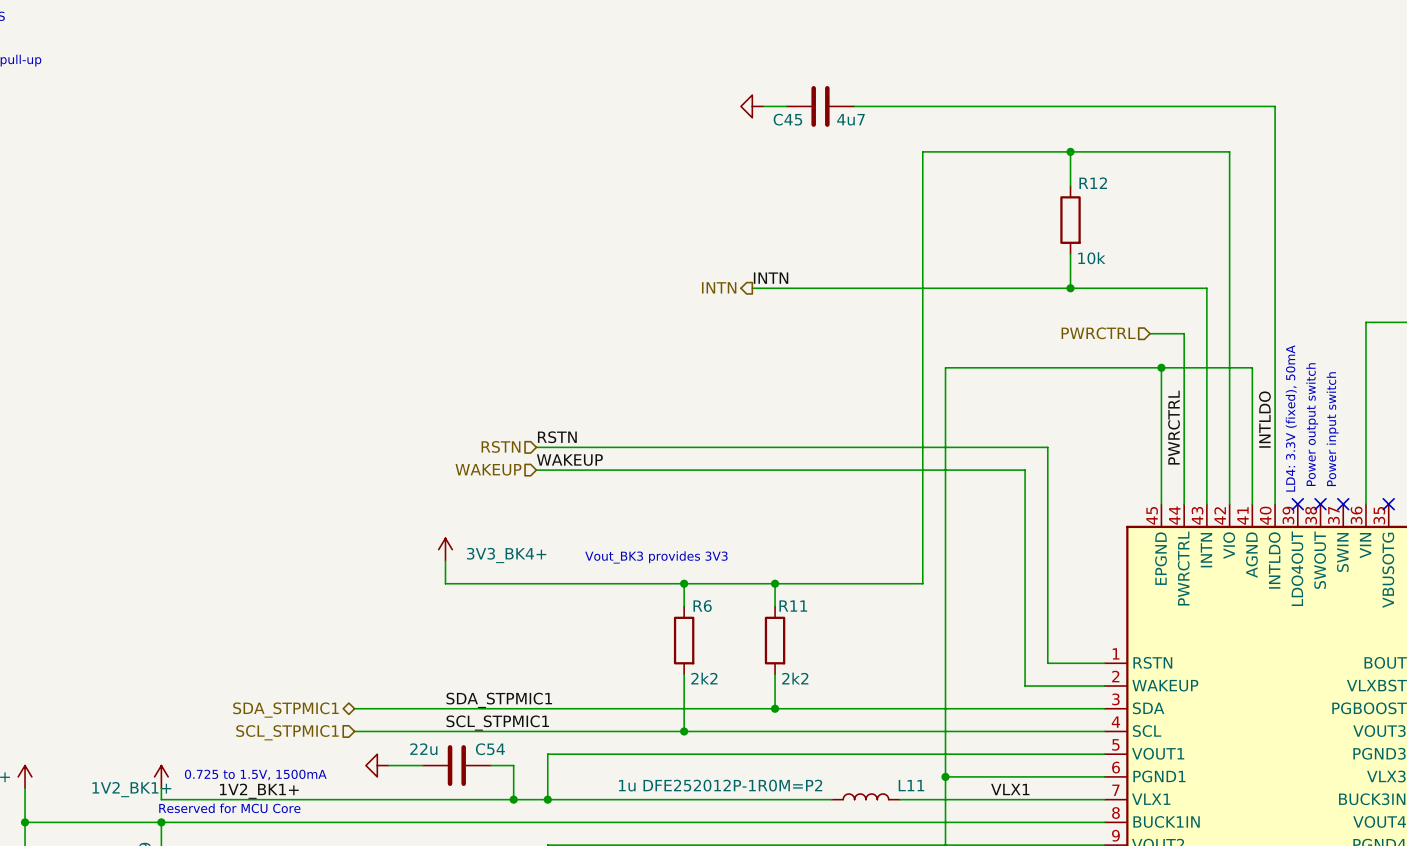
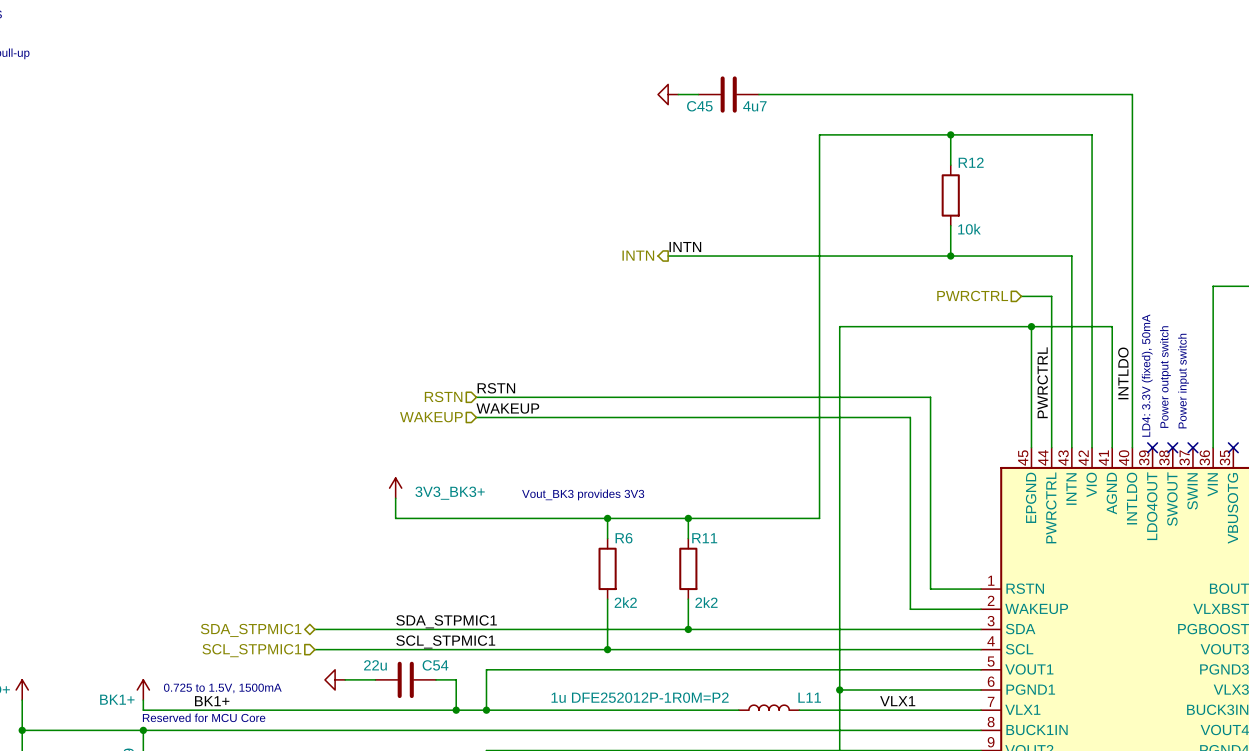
power symbol: 3V3_BK4+ (445, 549) -> 3V3_BK3+ (395, 488)
power symbol: 1V2_BK1+ (161, 776) -> BK1+ (143, 689)
label: 1V2_BK1+ (259, 791) -> BK1+ (212, 701)

